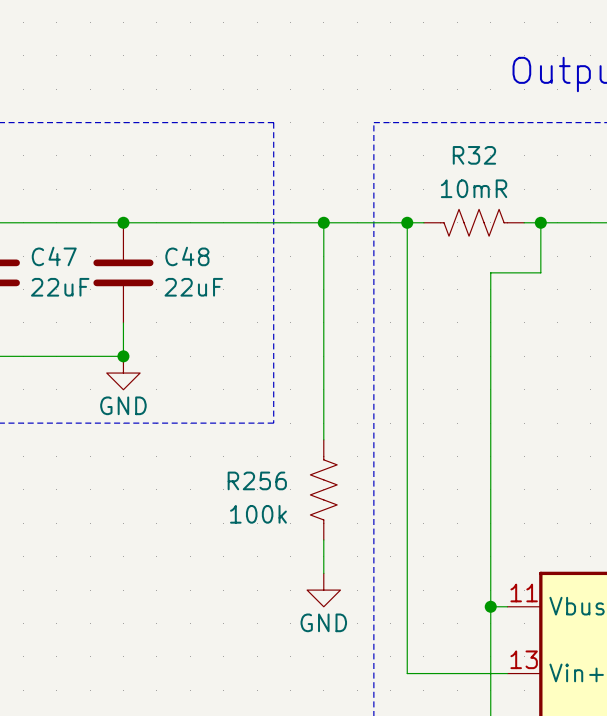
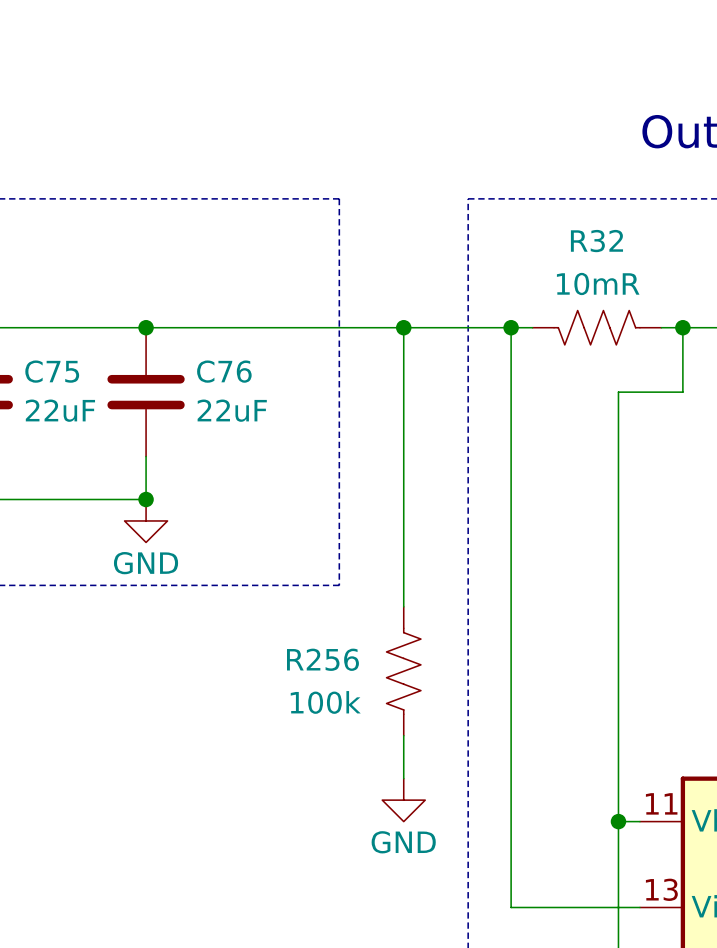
C47 name: C47 (54, 256) -> C75 (52, 371)
C48 name: C48 (187, 256) -> C76 (224, 371)

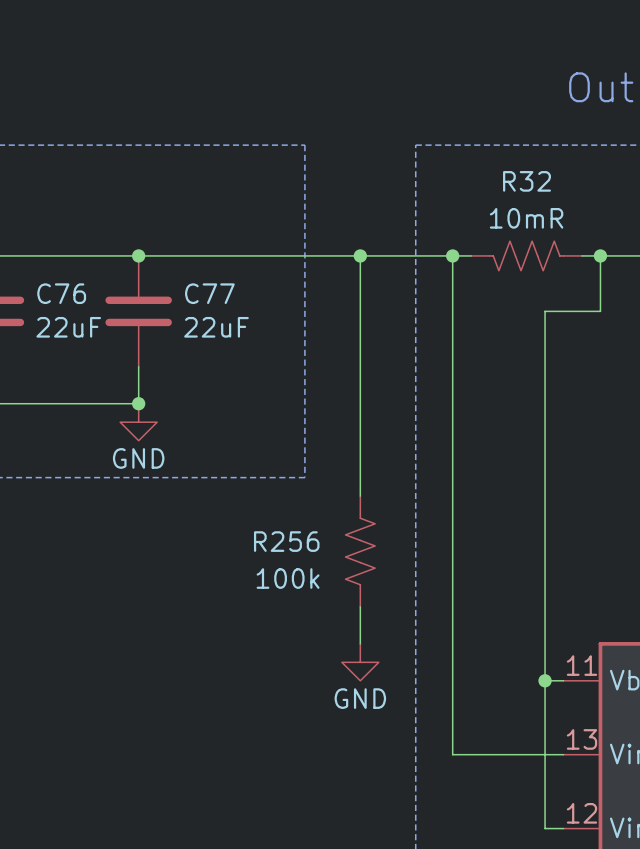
C75 name: C75 (52, 371) -> C76 (61, 293)
C76 name: C76 (224, 371) -> C77 (209, 293)

